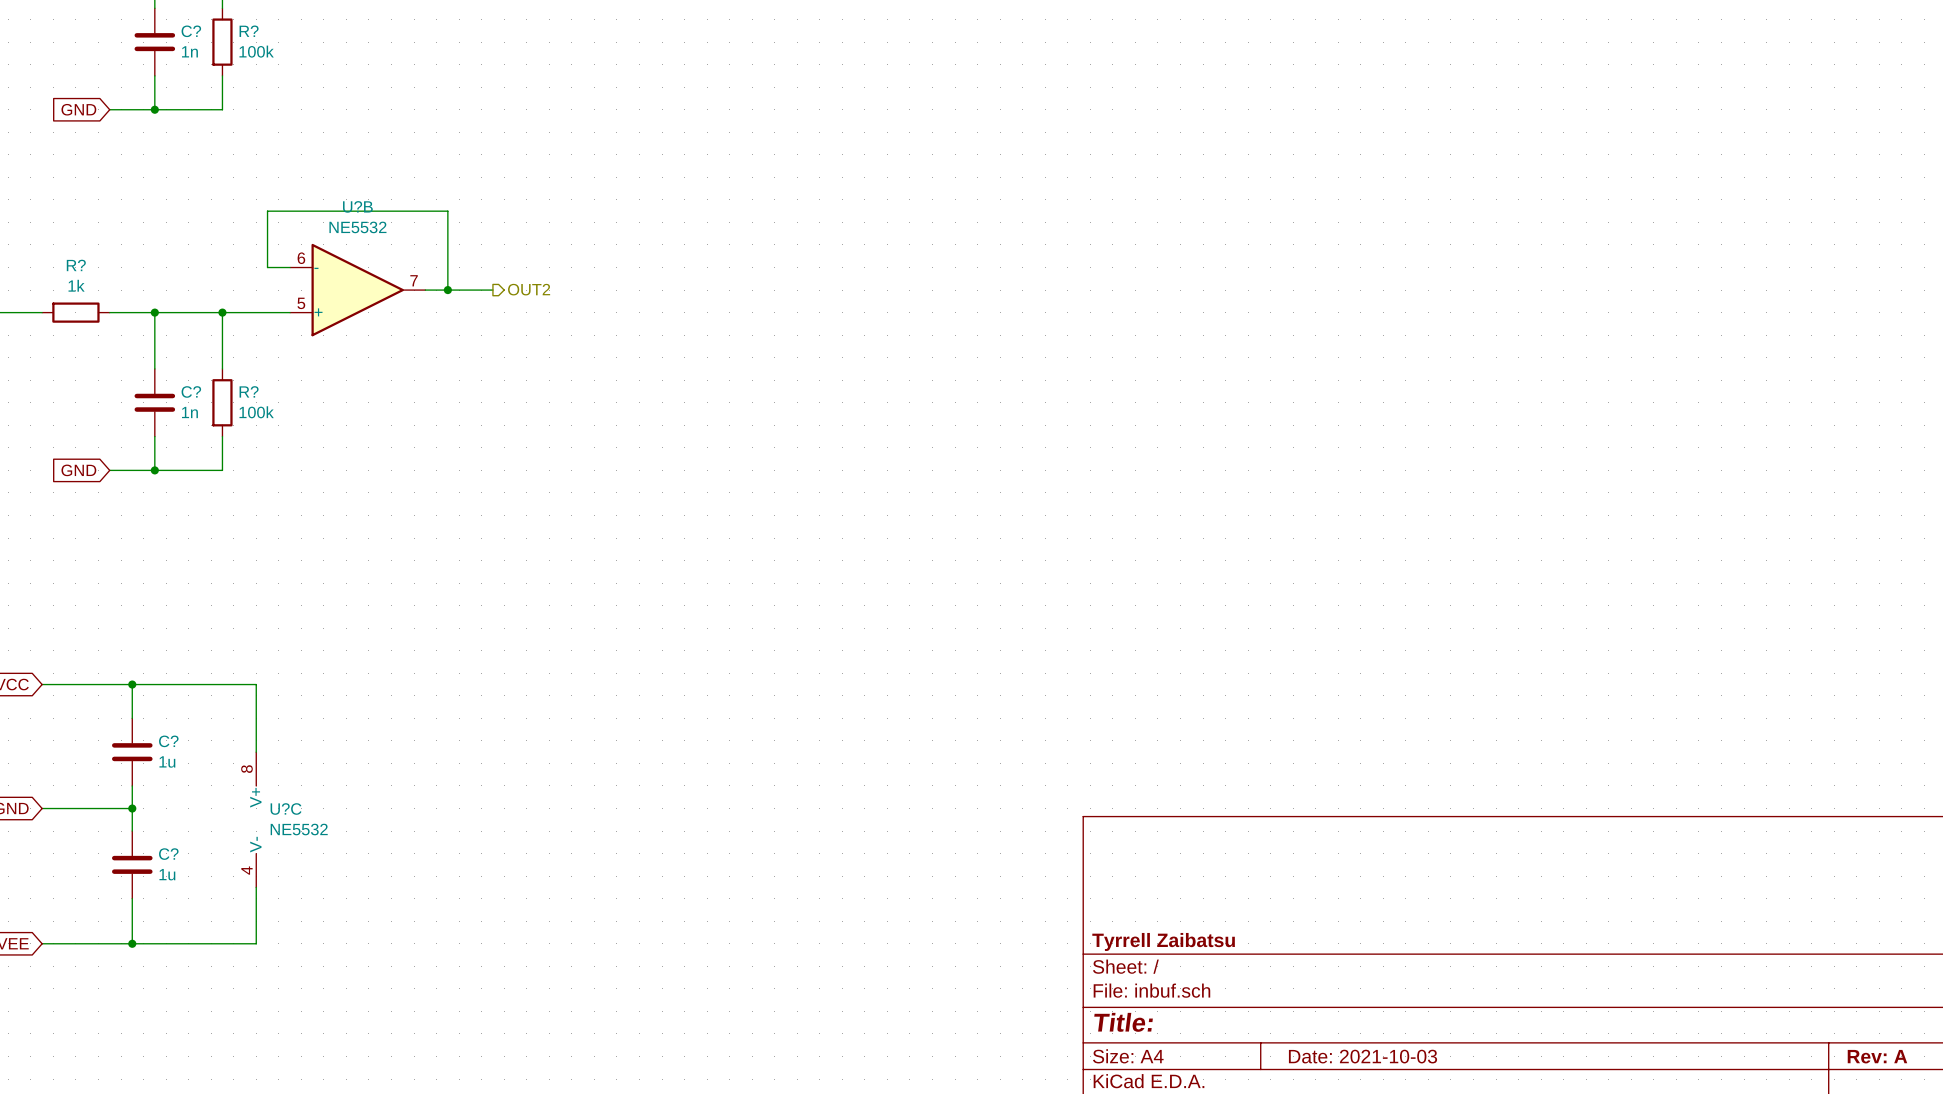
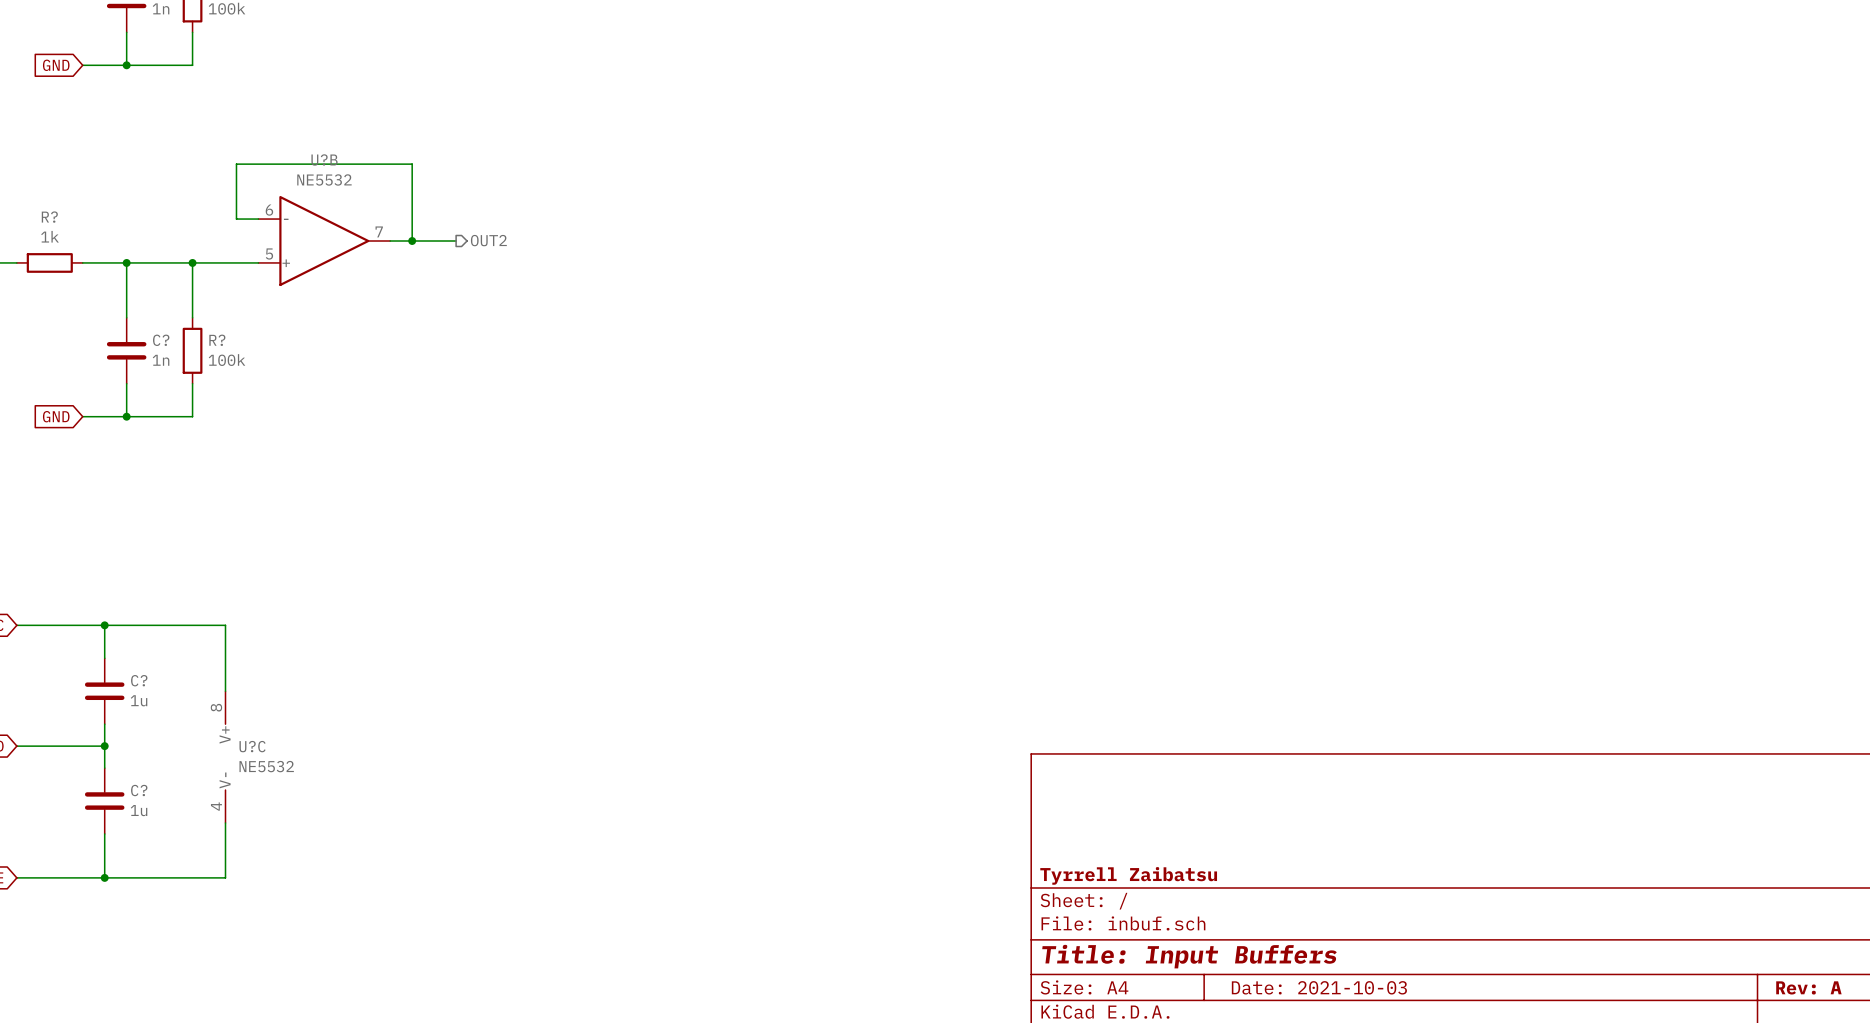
title block: Title: (1123, 1022) -> Title: Input Buffers (1189, 956)

